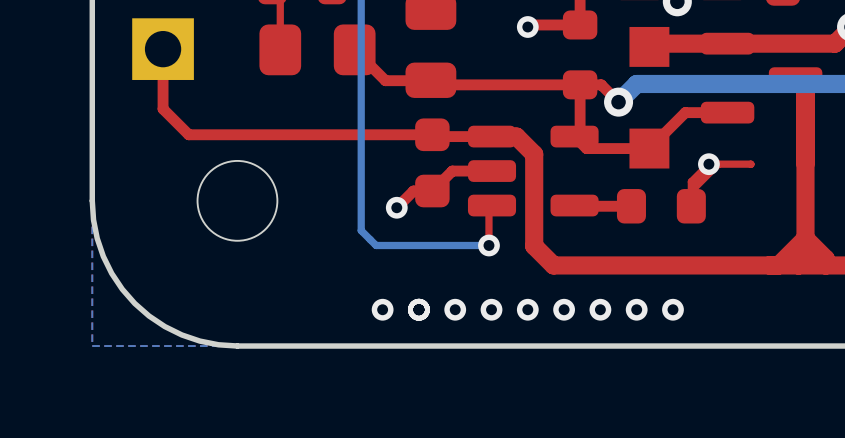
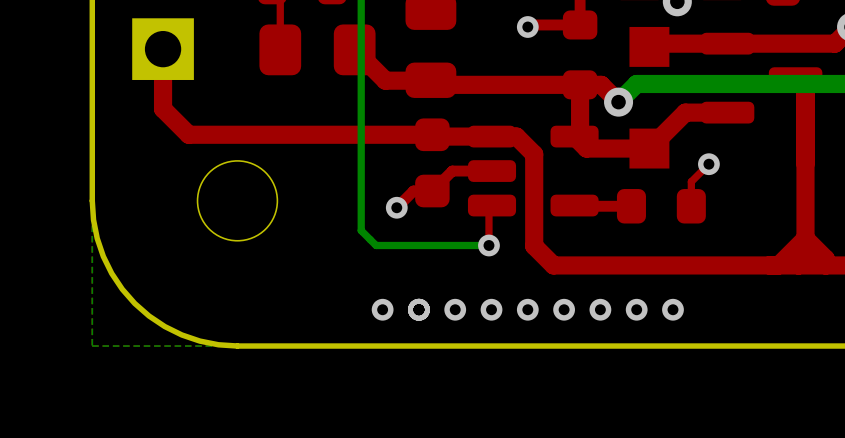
top track width: thin (163, 49) (163, 109) (188, 134) (492, 136) -> thick (163, 49) (163, 109) (188, 134) (492, 136)
top track width: thin (354, 49) (385, 80) (432, 80) (436, 84) (601, 84) (618, 102) -> thick (354, 49) (385, 80) (432, 80) (436, 84) (601, 84) (618, 102)
top track width: thin (580, 84) (580, 131) (574, 136) (586, 148) (649, 148) (685, 112) (727, 112) -> thick (580, 84) (580, 131) (574, 136) (586, 148) (649, 148) (685, 112) (727, 112)
top track: (750, 164) (718, 164) (691, 191) -> none

